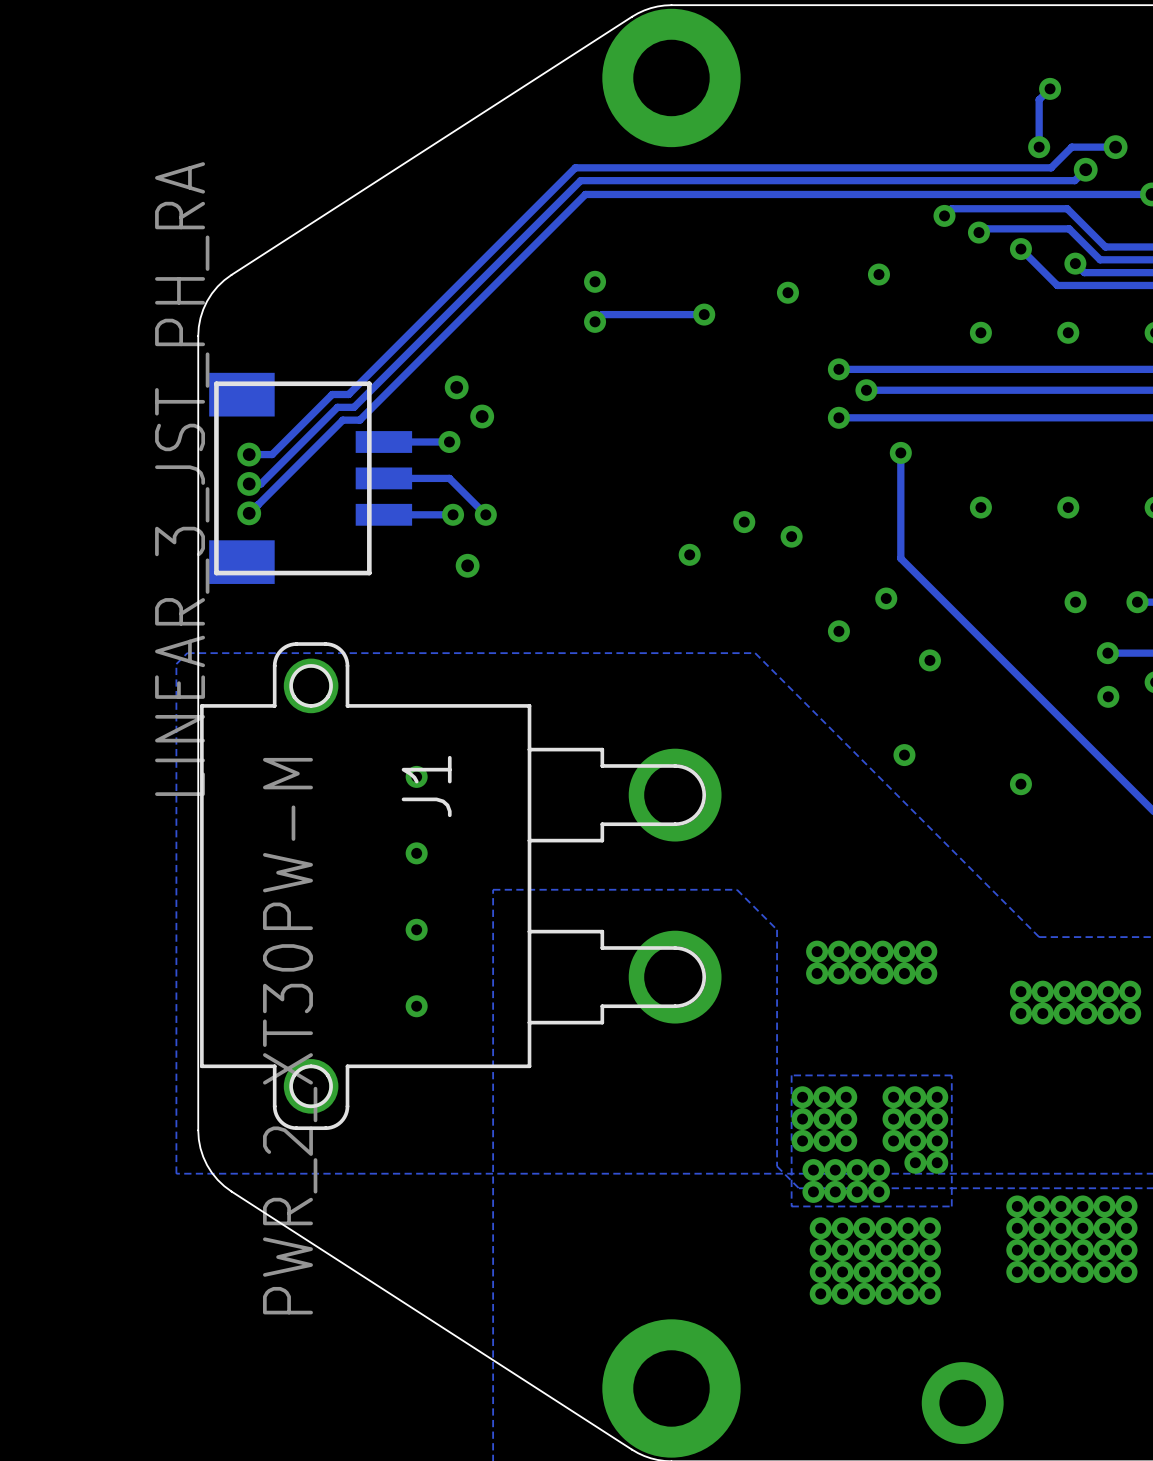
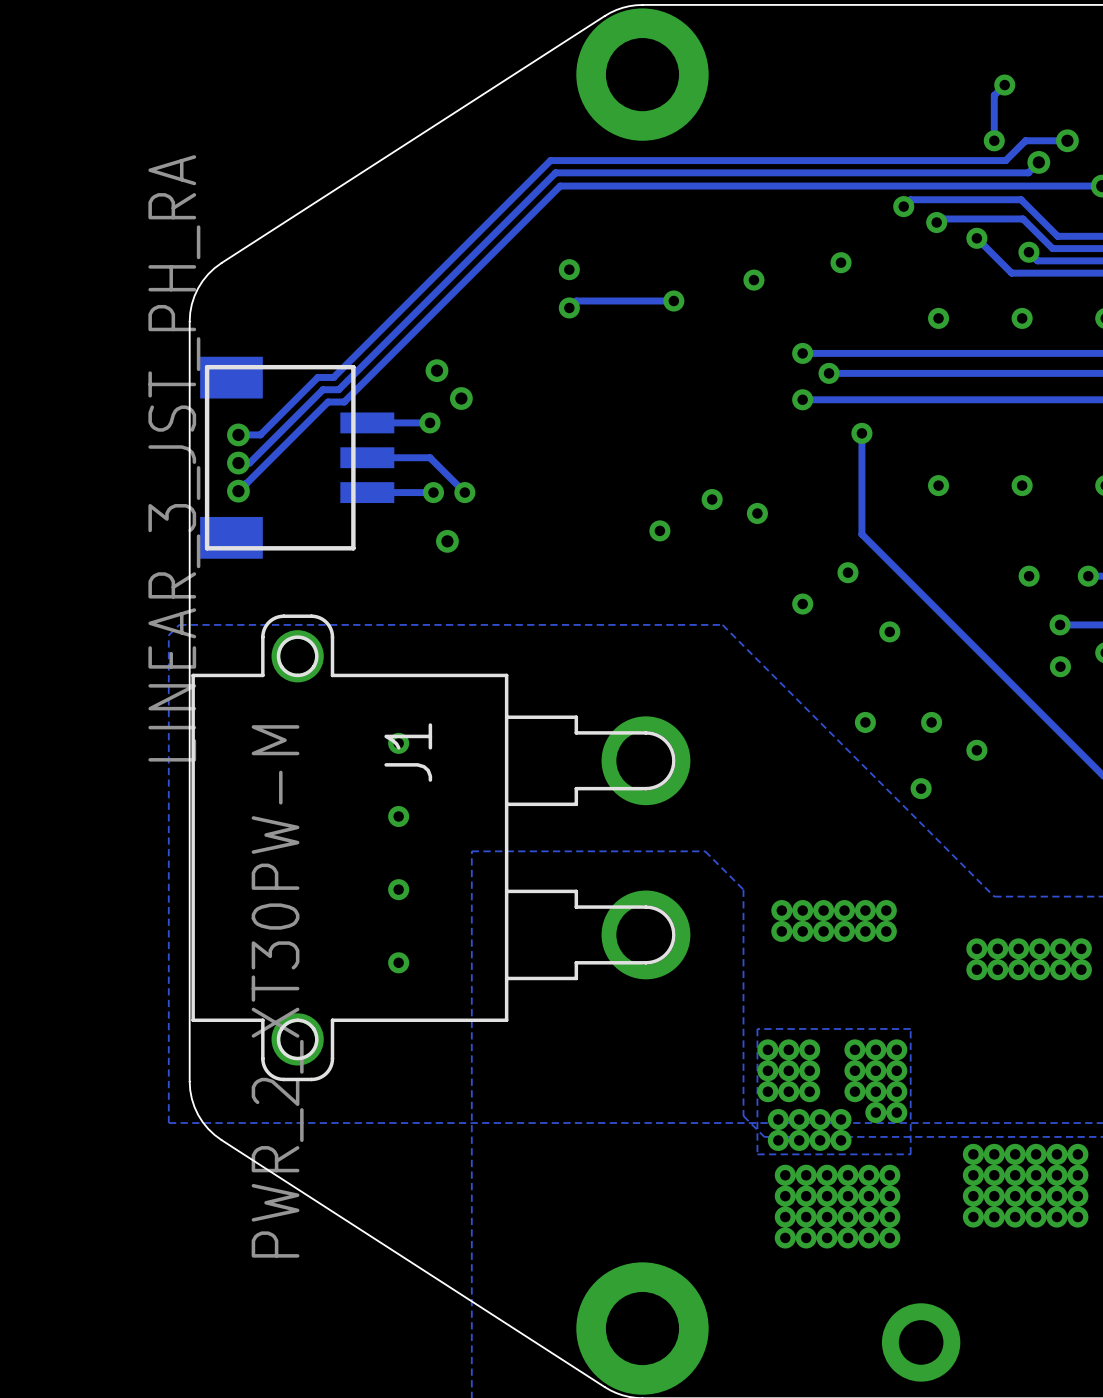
via: none -> (931, 722)
via: none -> (921, 788)

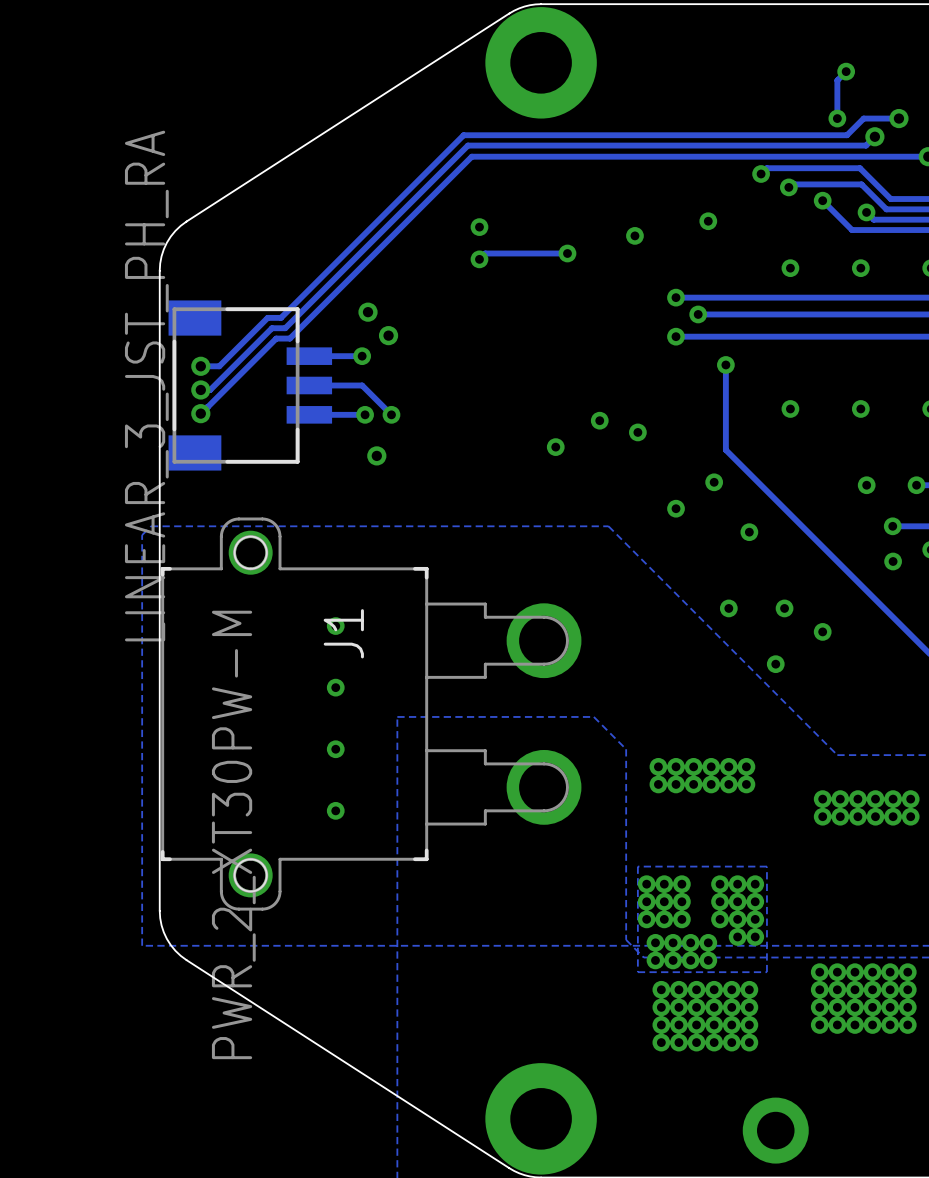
part footprint: [200, 356, 395, 559] -> [168, 300, 333, 471]
J1 footprint: [191, 614, 691, 1082] -> [160, 517, 582, 911]

